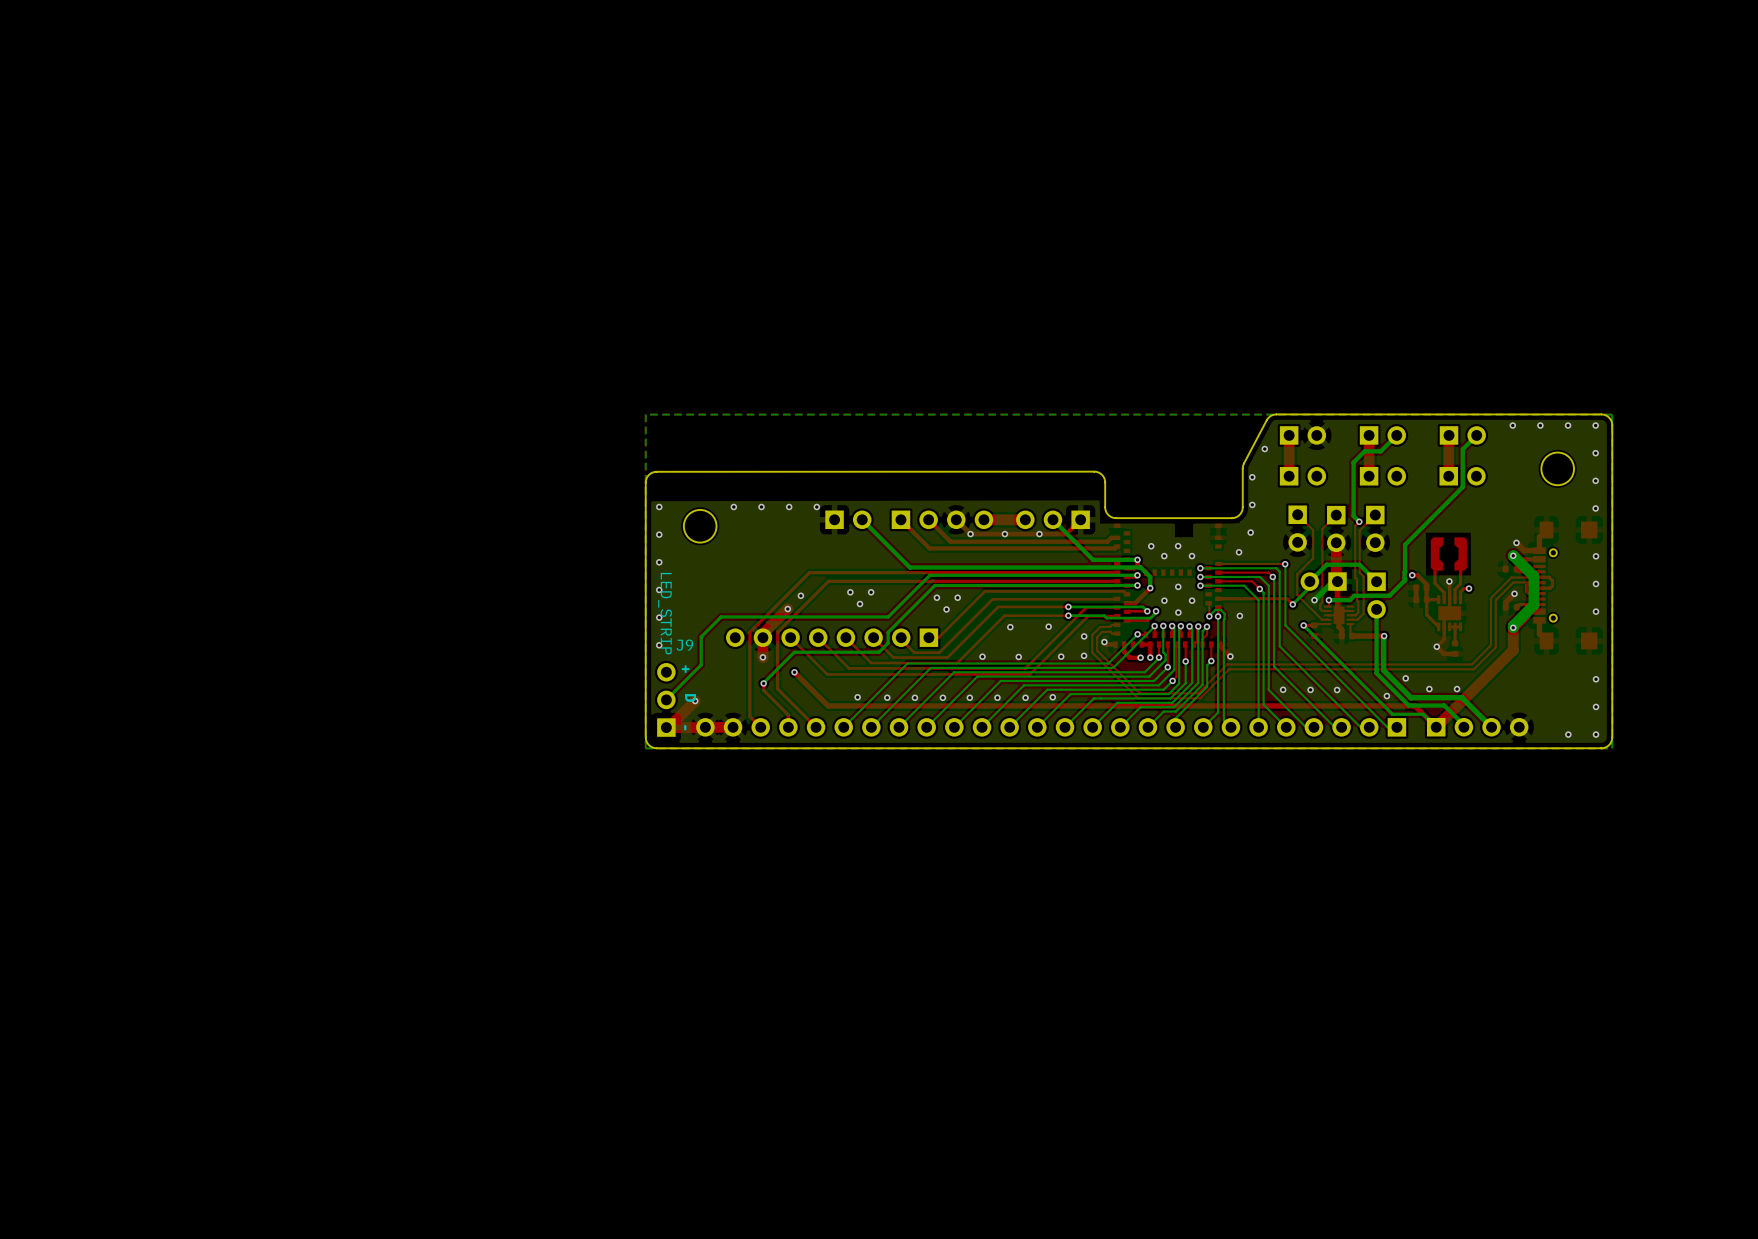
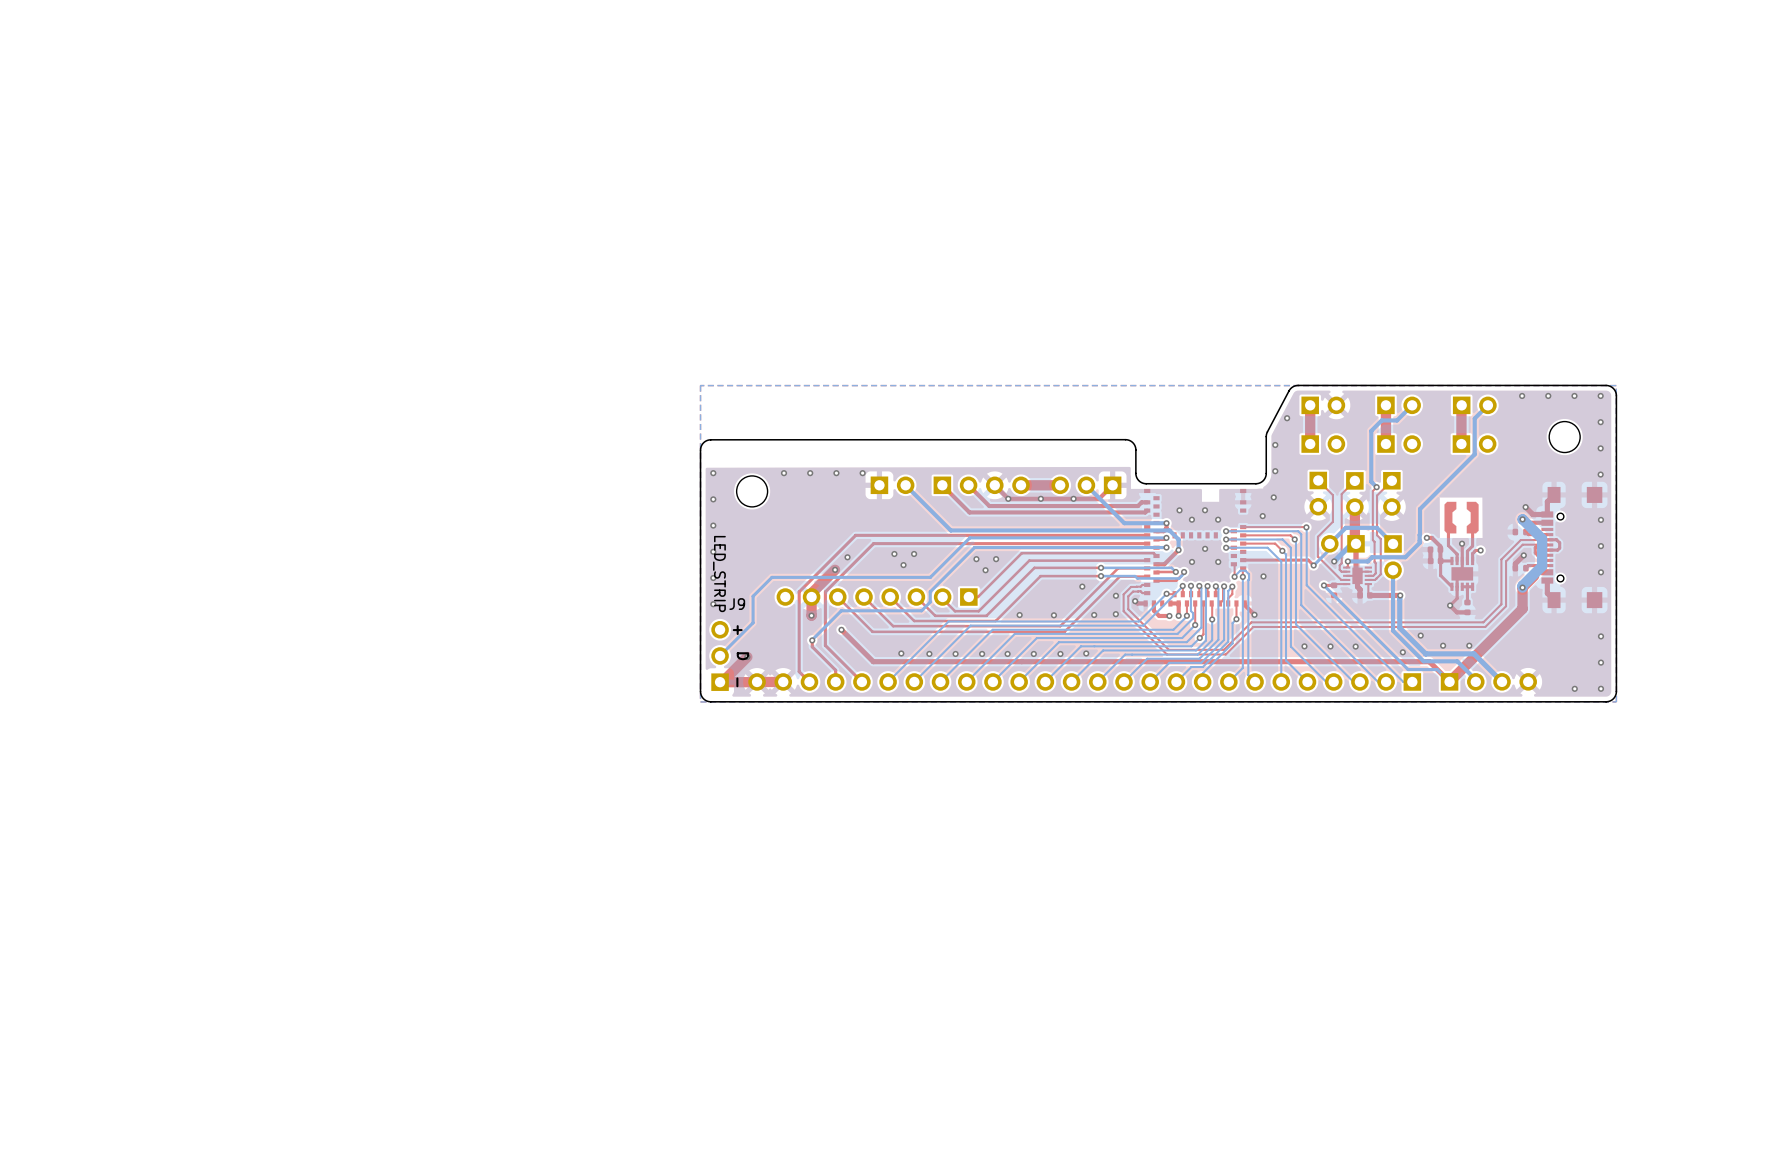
via: (1178, 612) -> none
via: (1010, 627) -> none

